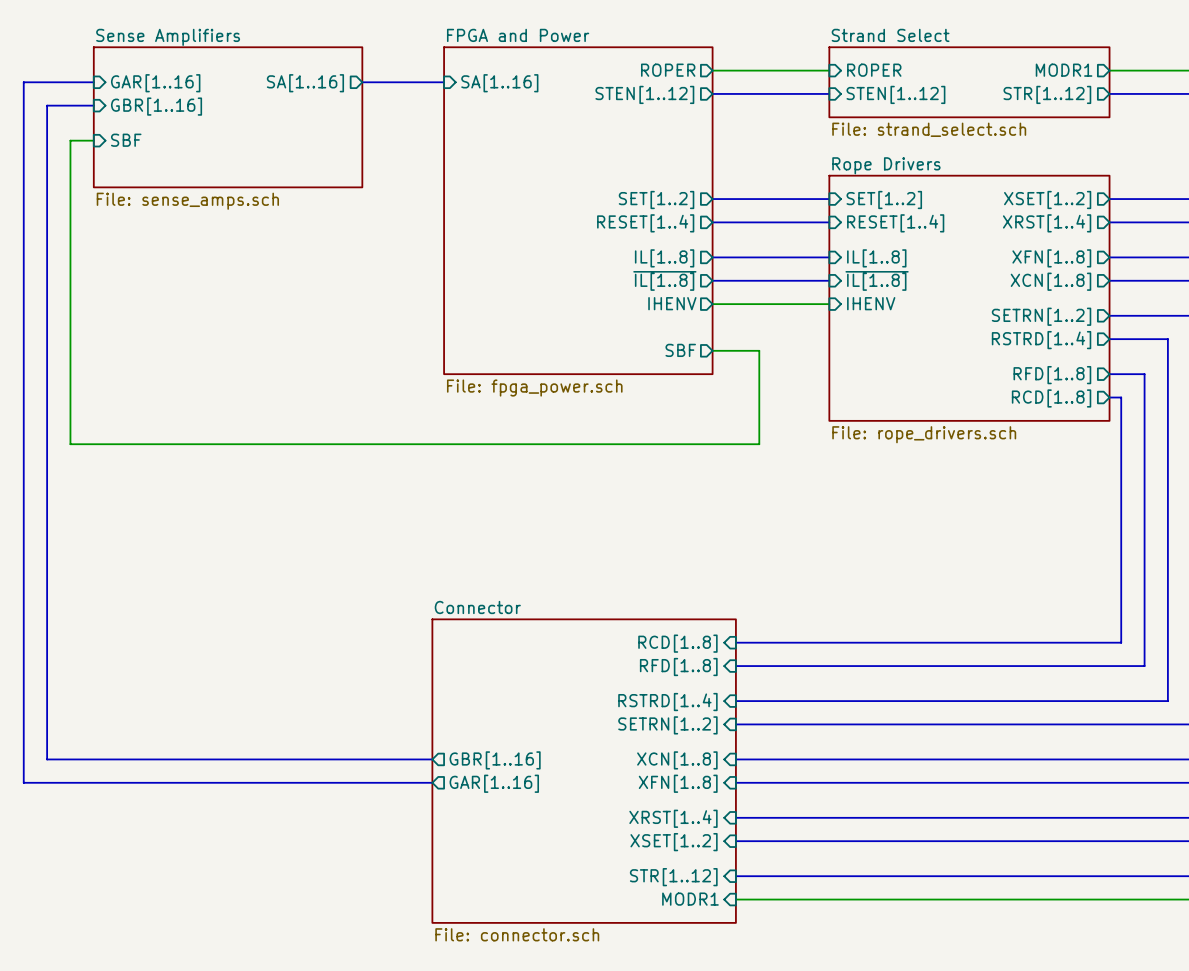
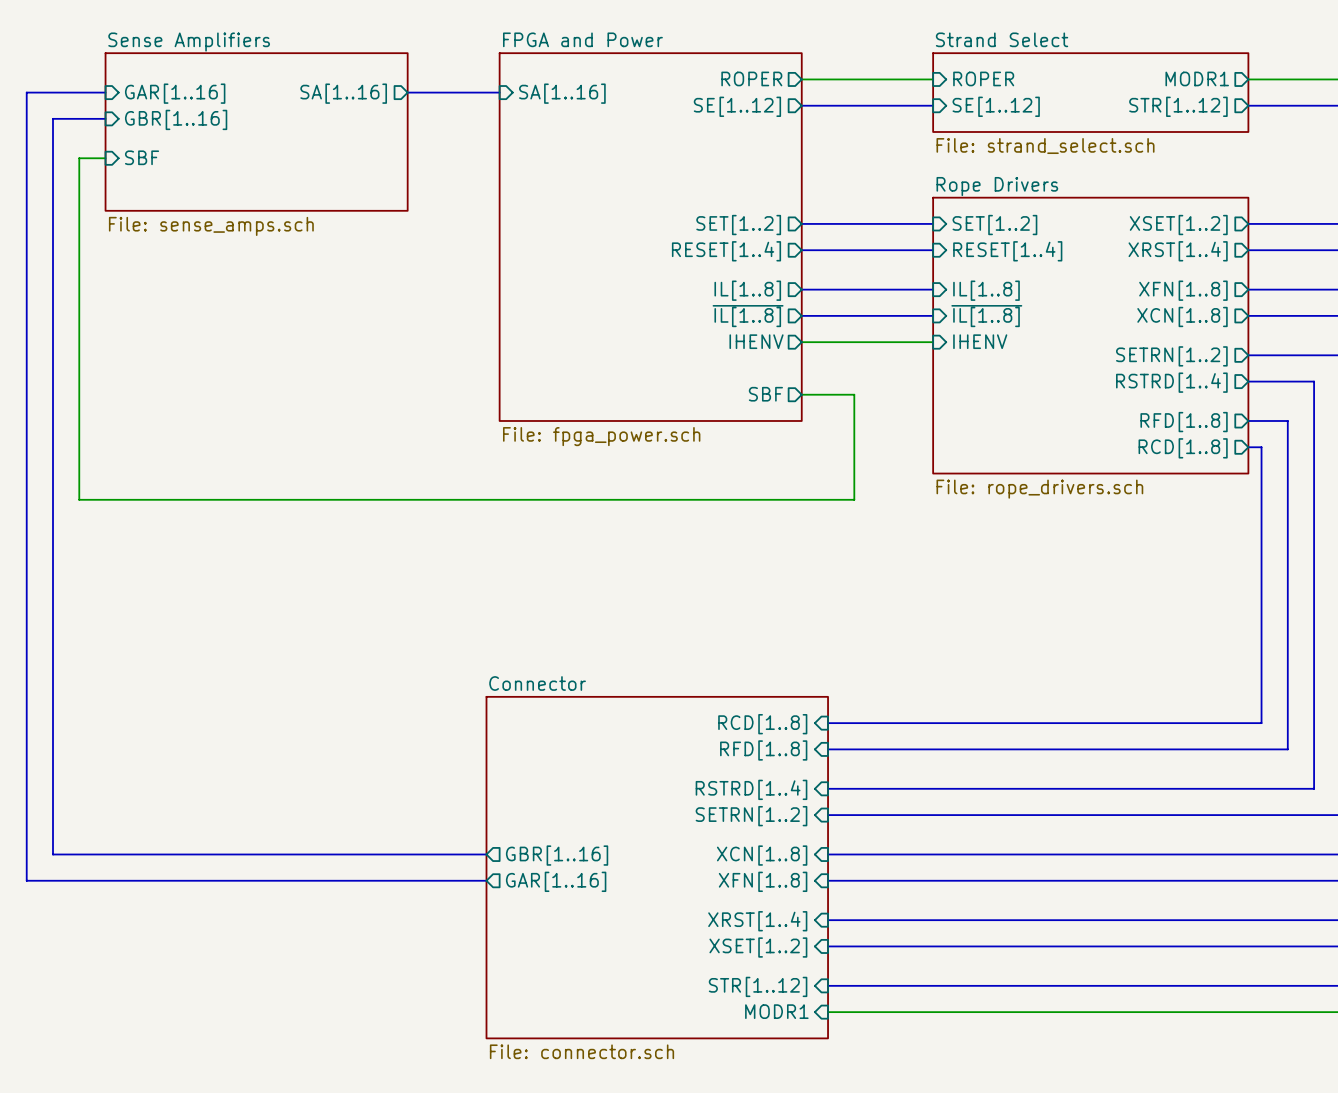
sheet pin: STEN[1..12] (644, 94) -> SE[1..12] (737, 106)
sheet pin: STEN[1..12] (895, 94) -> SE[1..12] (996, 106)

